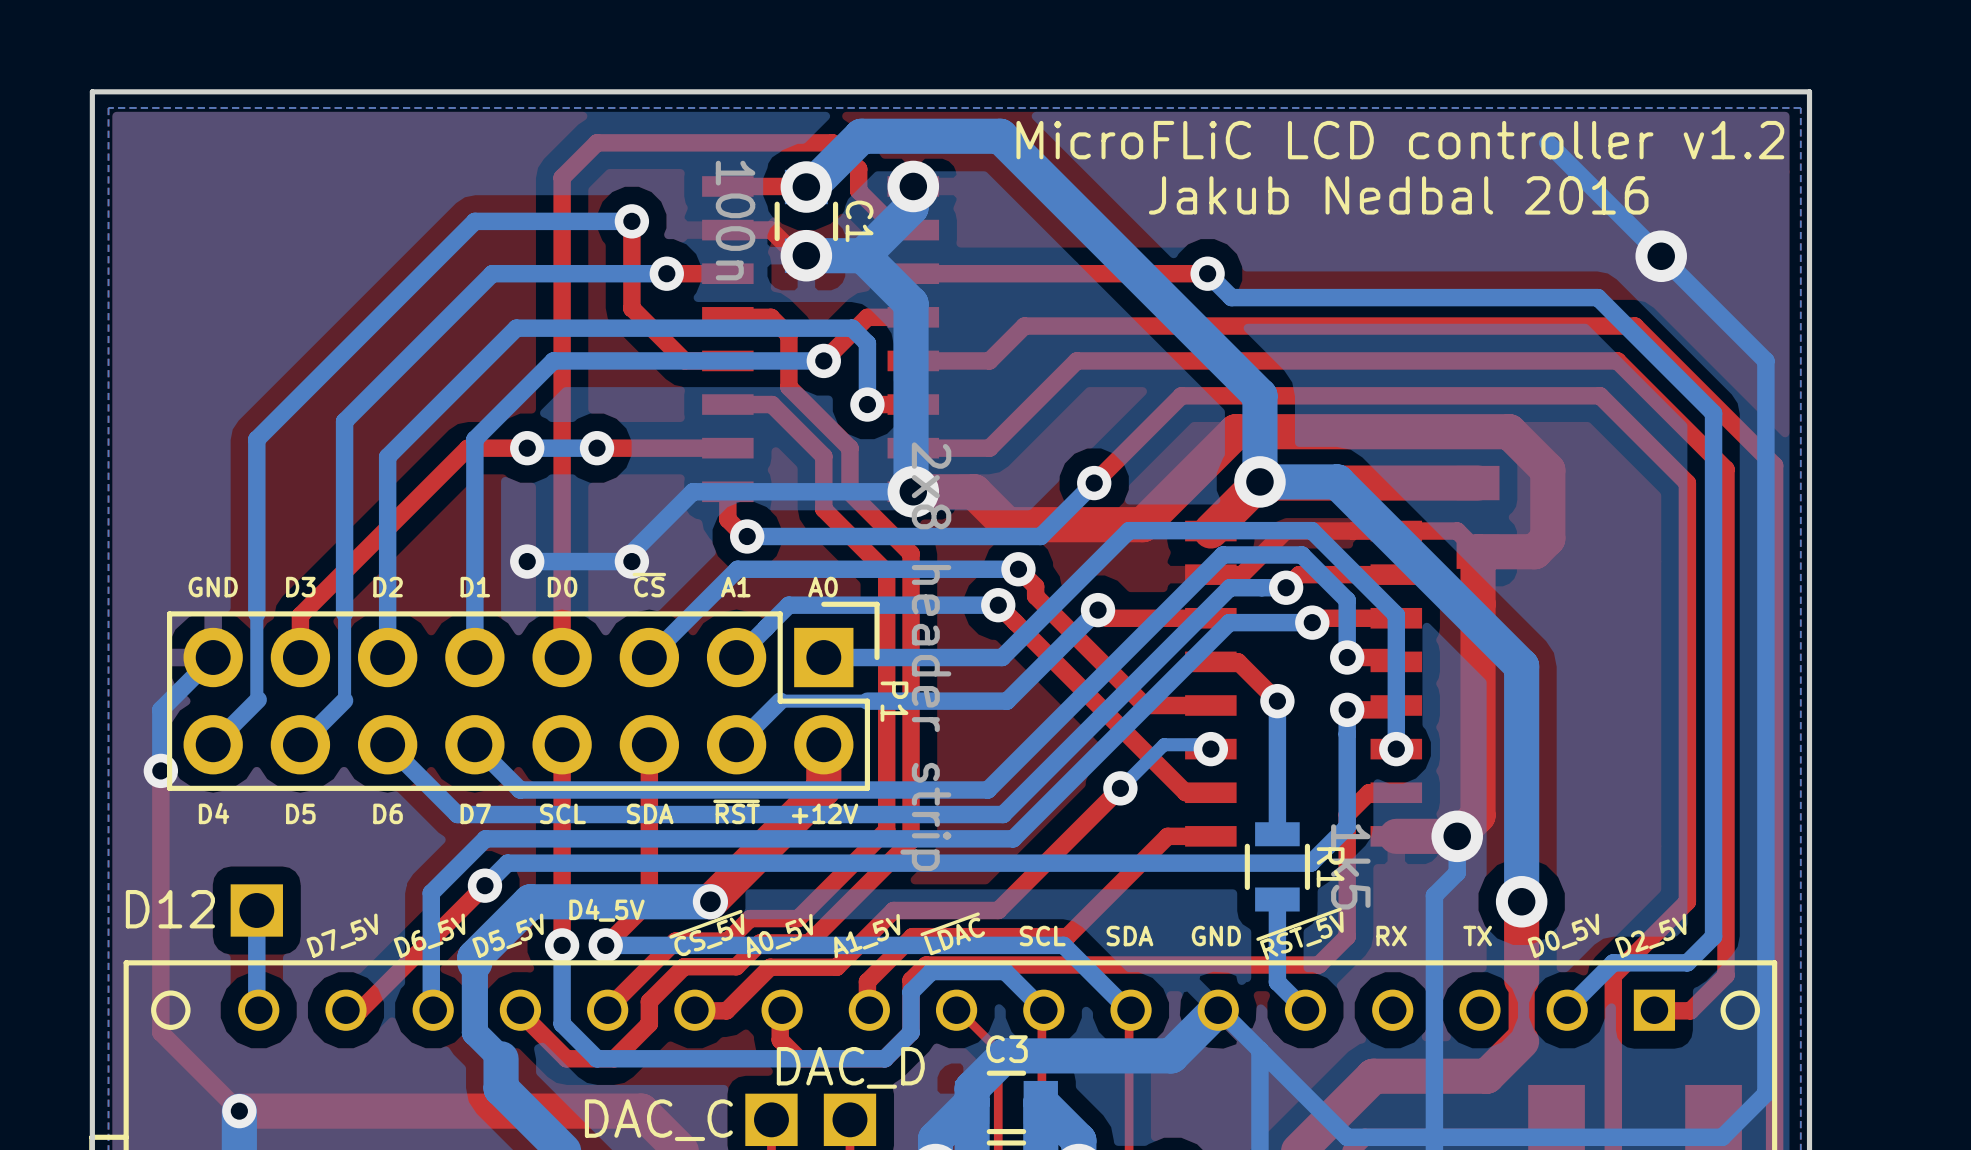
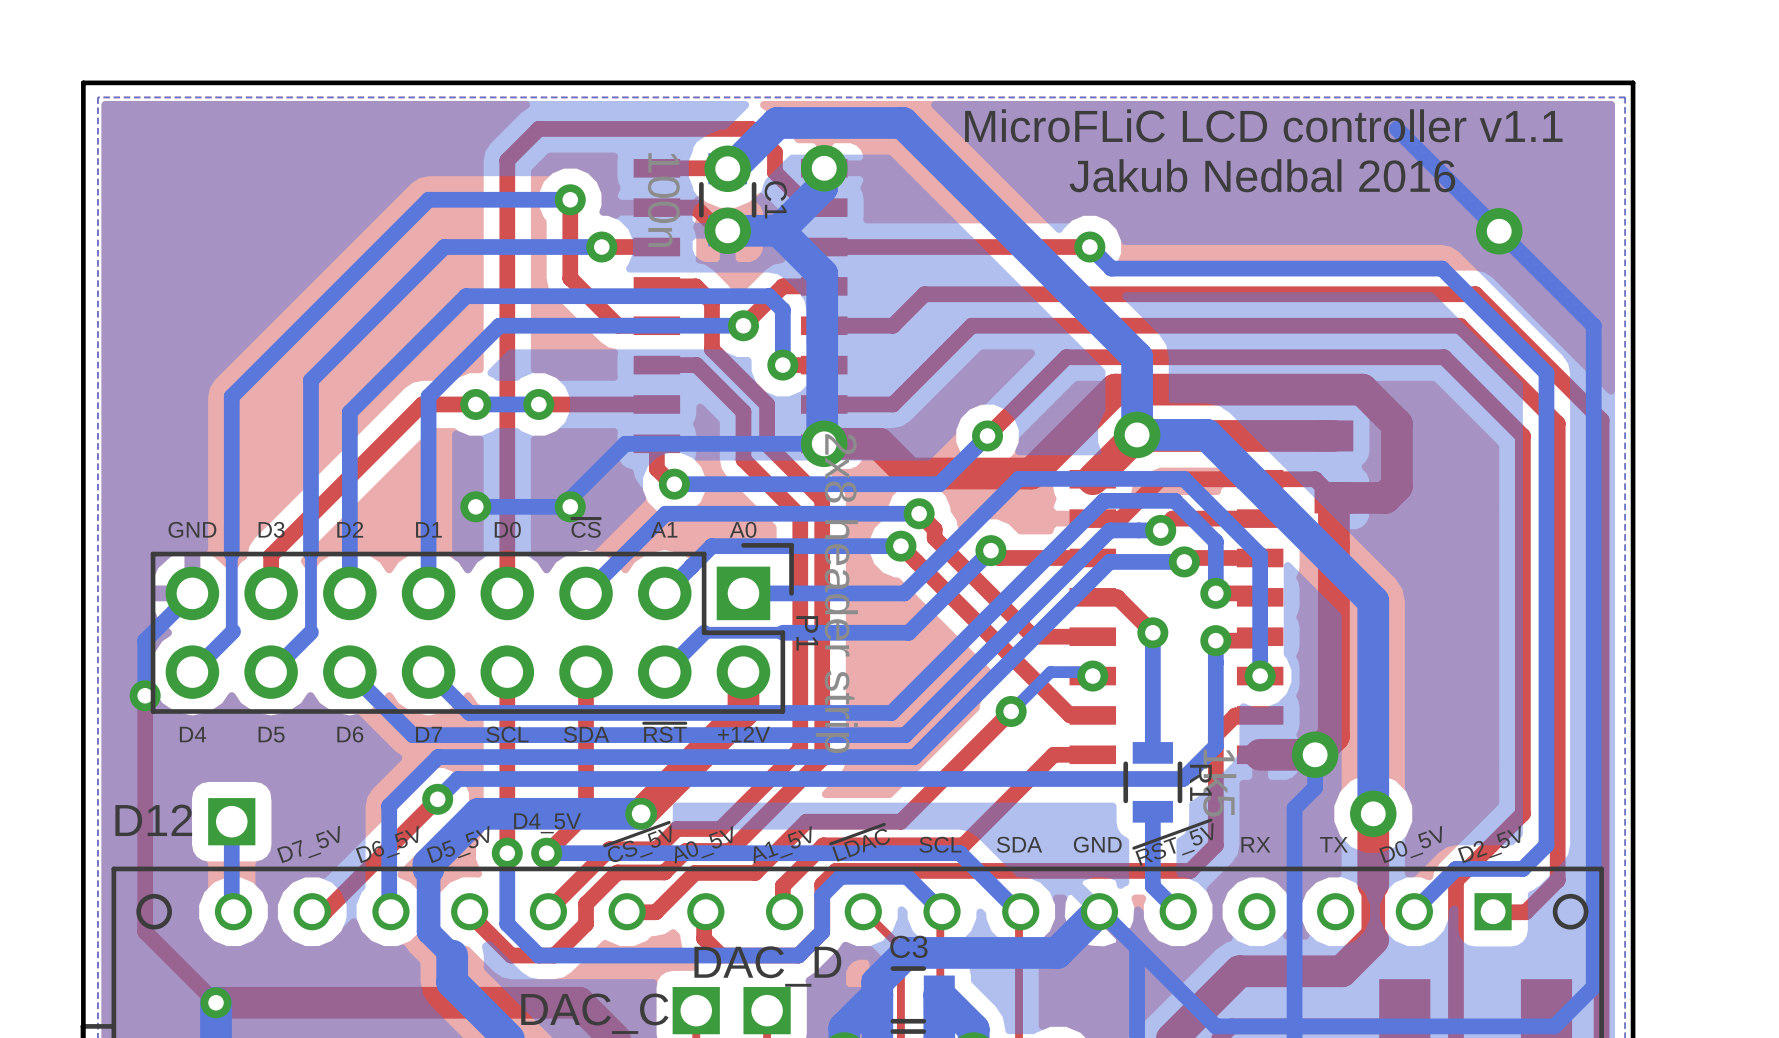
text: MicroFLiC LCD controller v1.2 (1400, 140) -> MicroFLiC LCD controller v1.1 (1263, 125)

